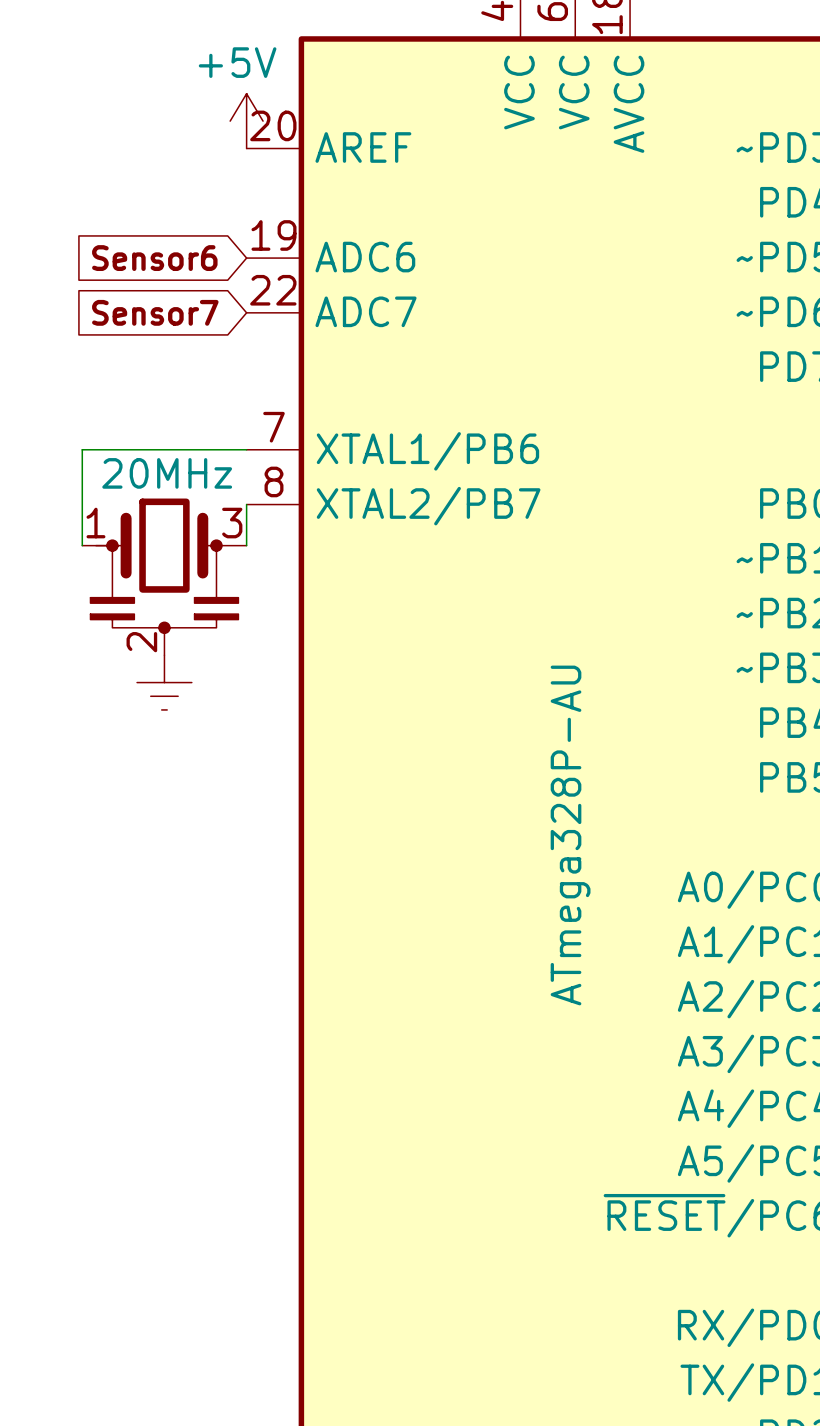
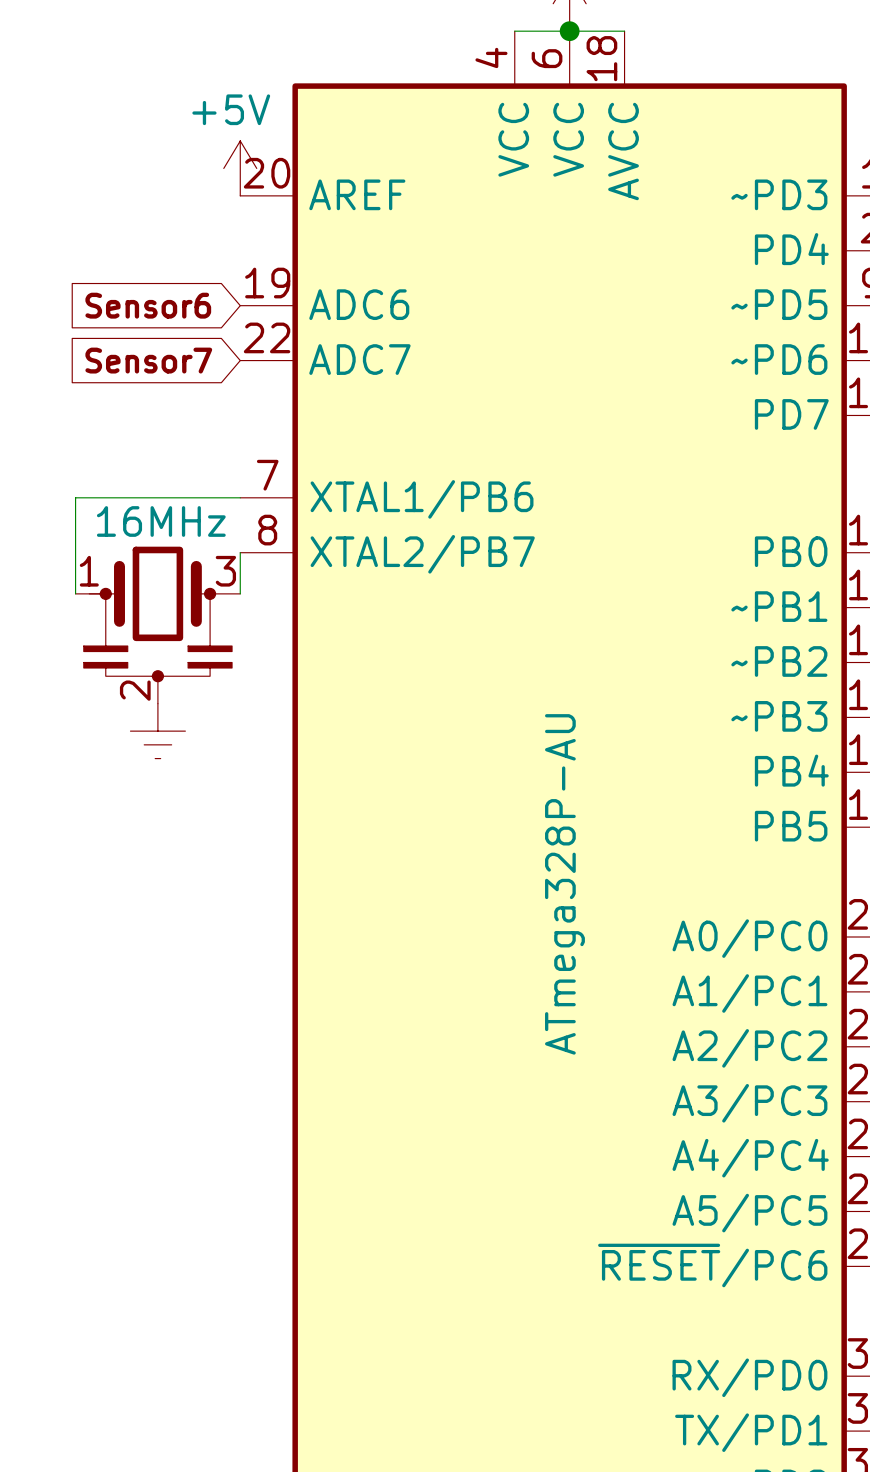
part value: 20MHz (167, 473) -> 16MHz (161, 521)

